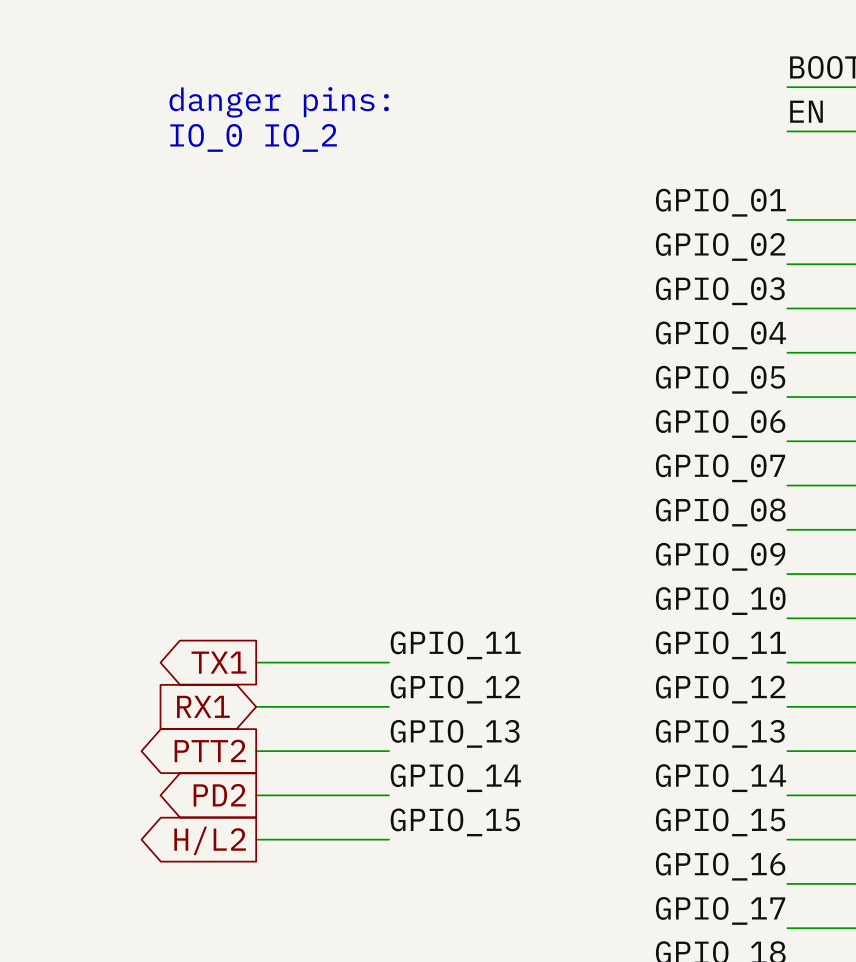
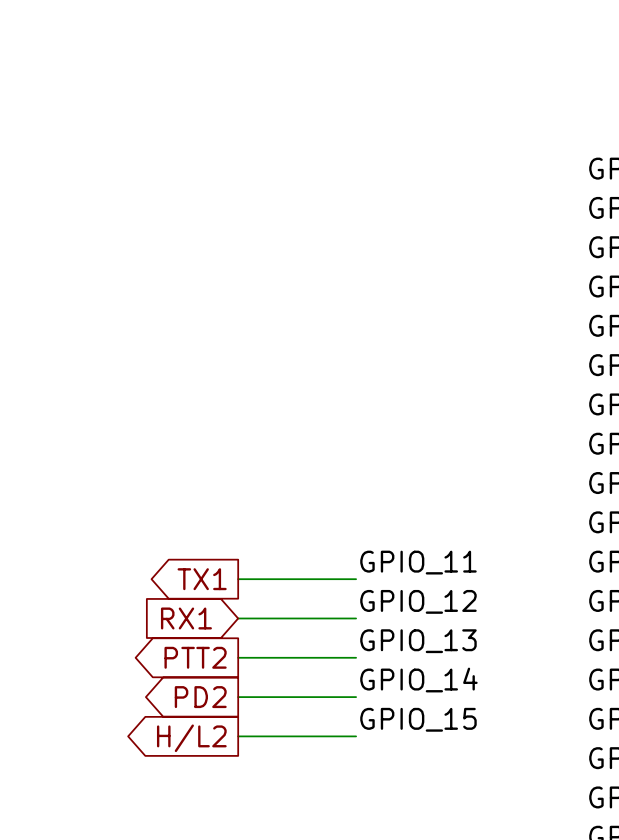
text: danger pins: (279, 102) -> none
text: IO_0 IO_2 (253, 137) -> none

